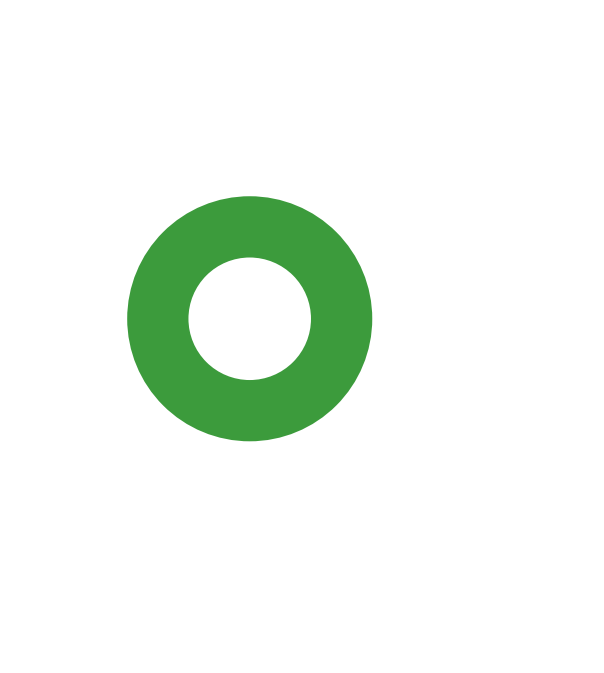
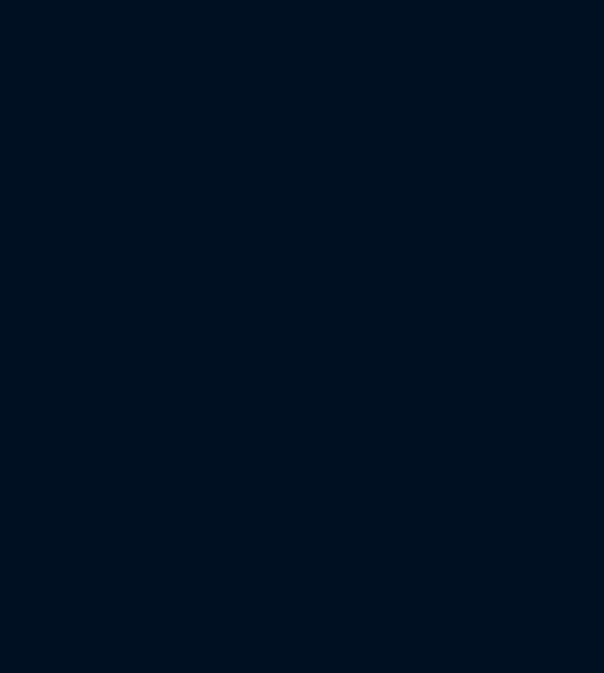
part: (249, 318) -> none

